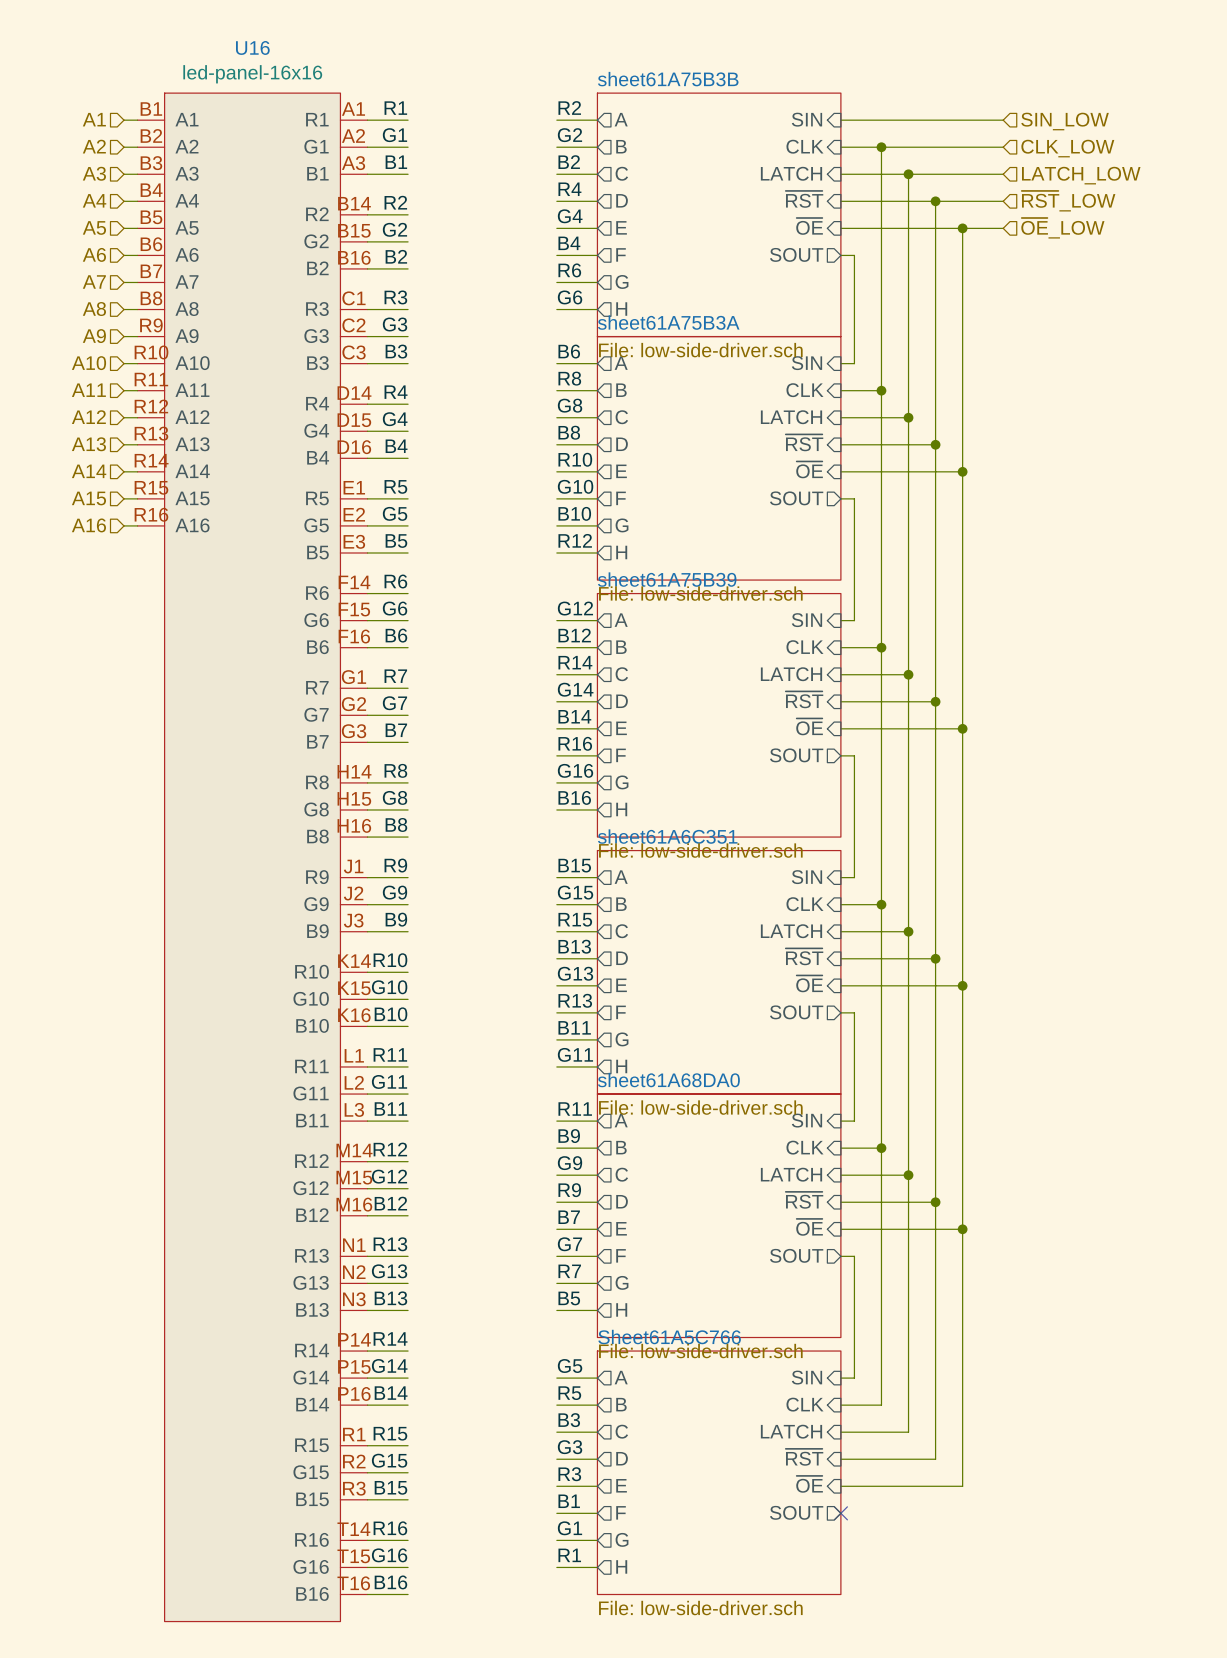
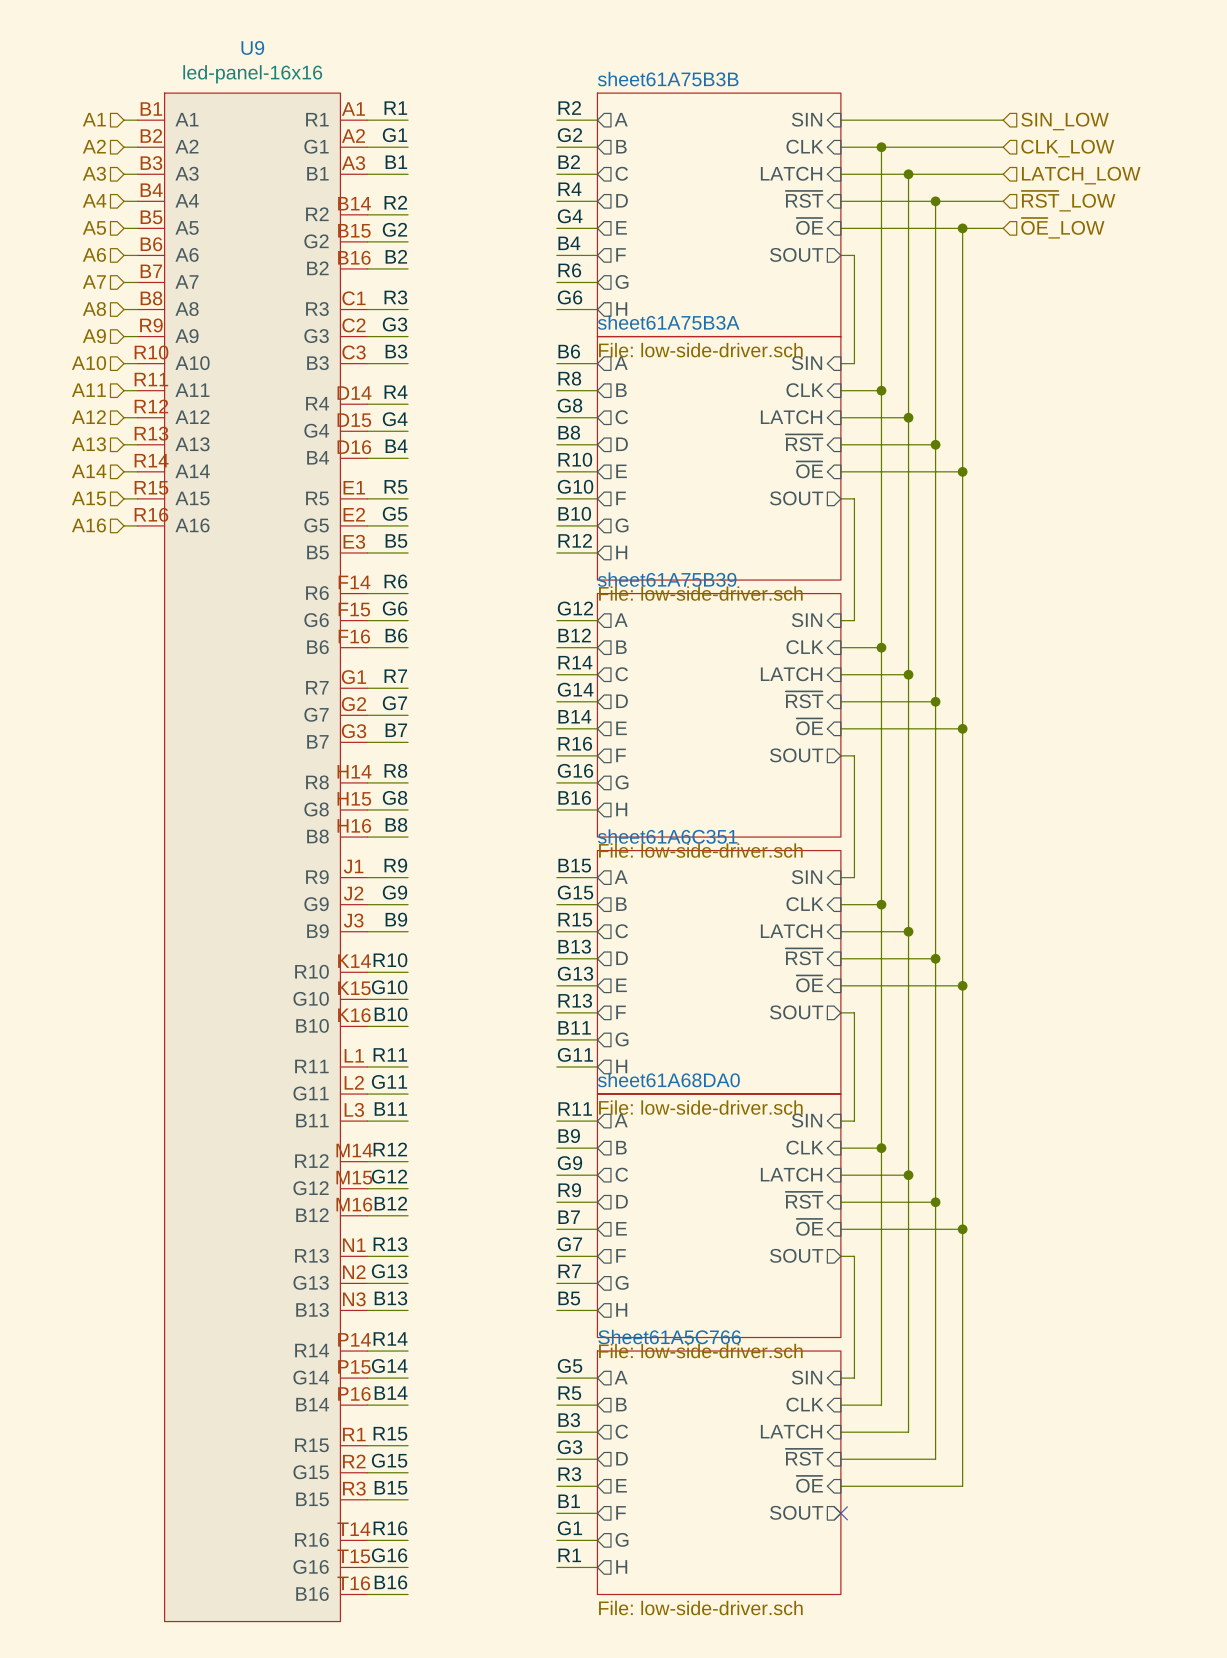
U16 name: U16 (252, 47) -> U9 (252, 47)

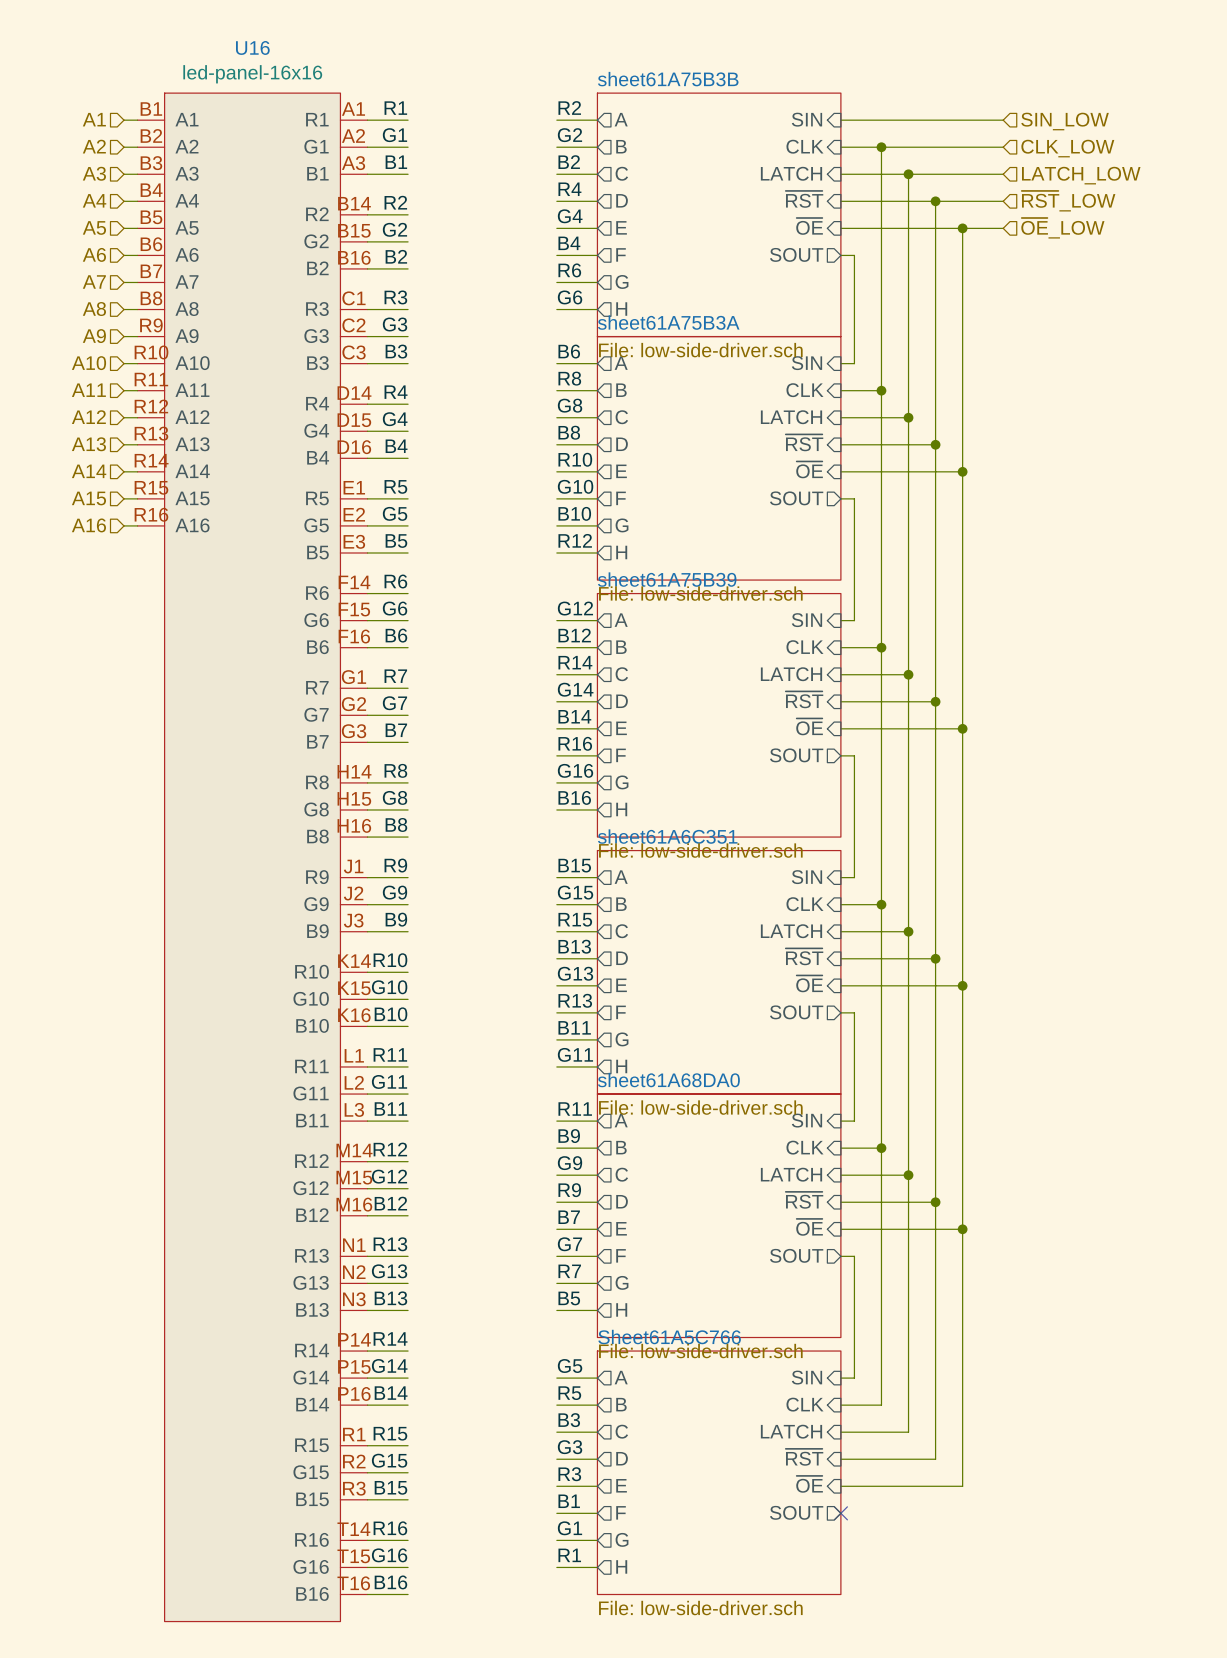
U9 name: U9 (252, 47) -> U16 (252, 47)

